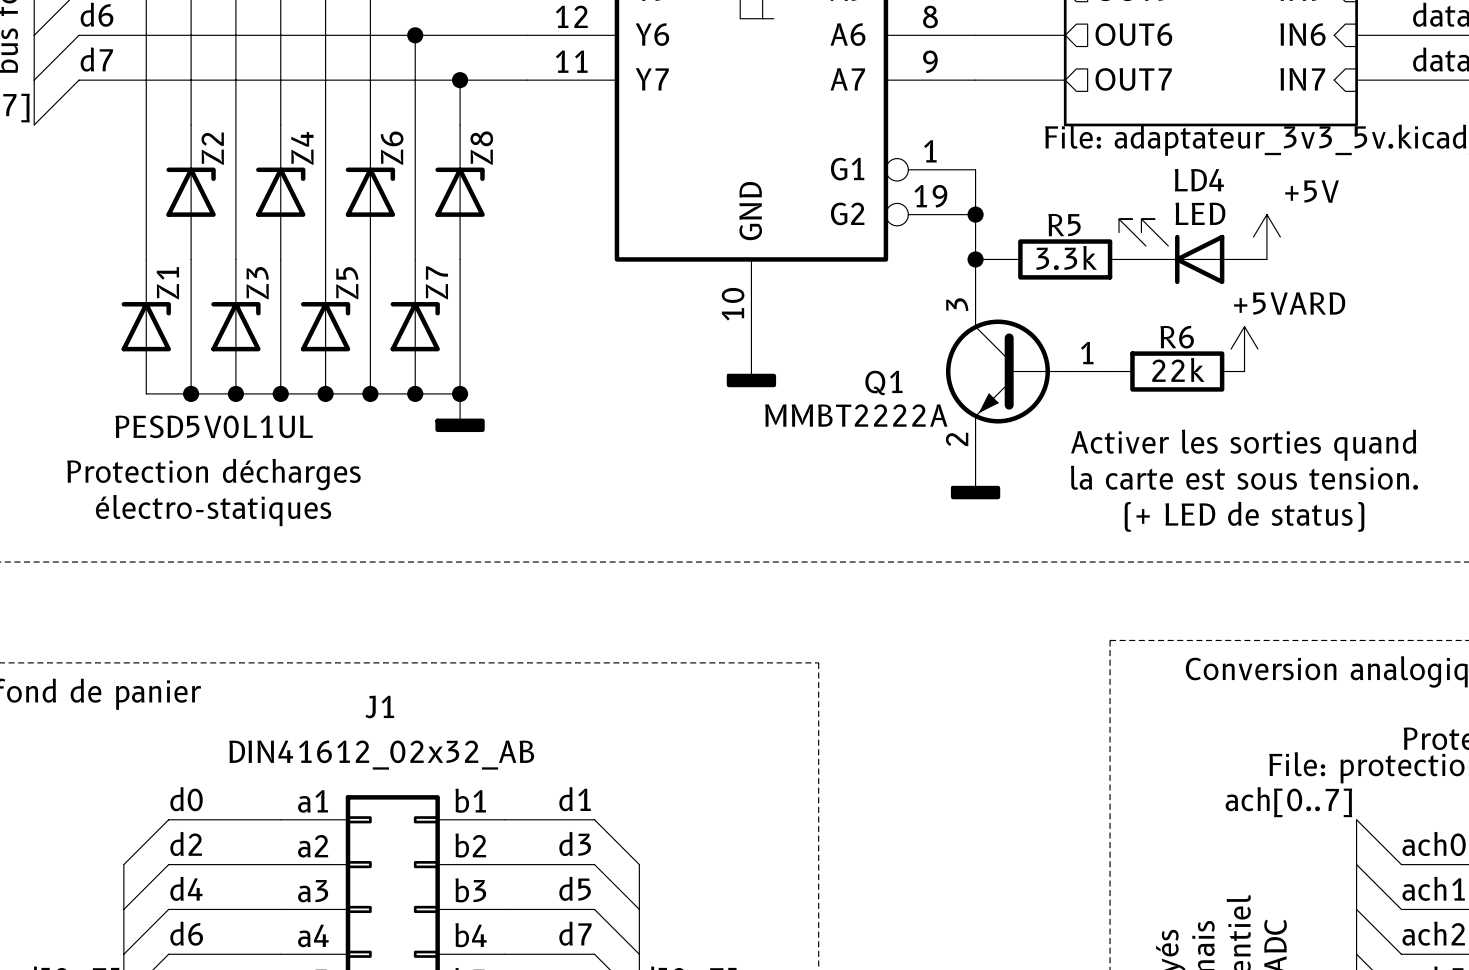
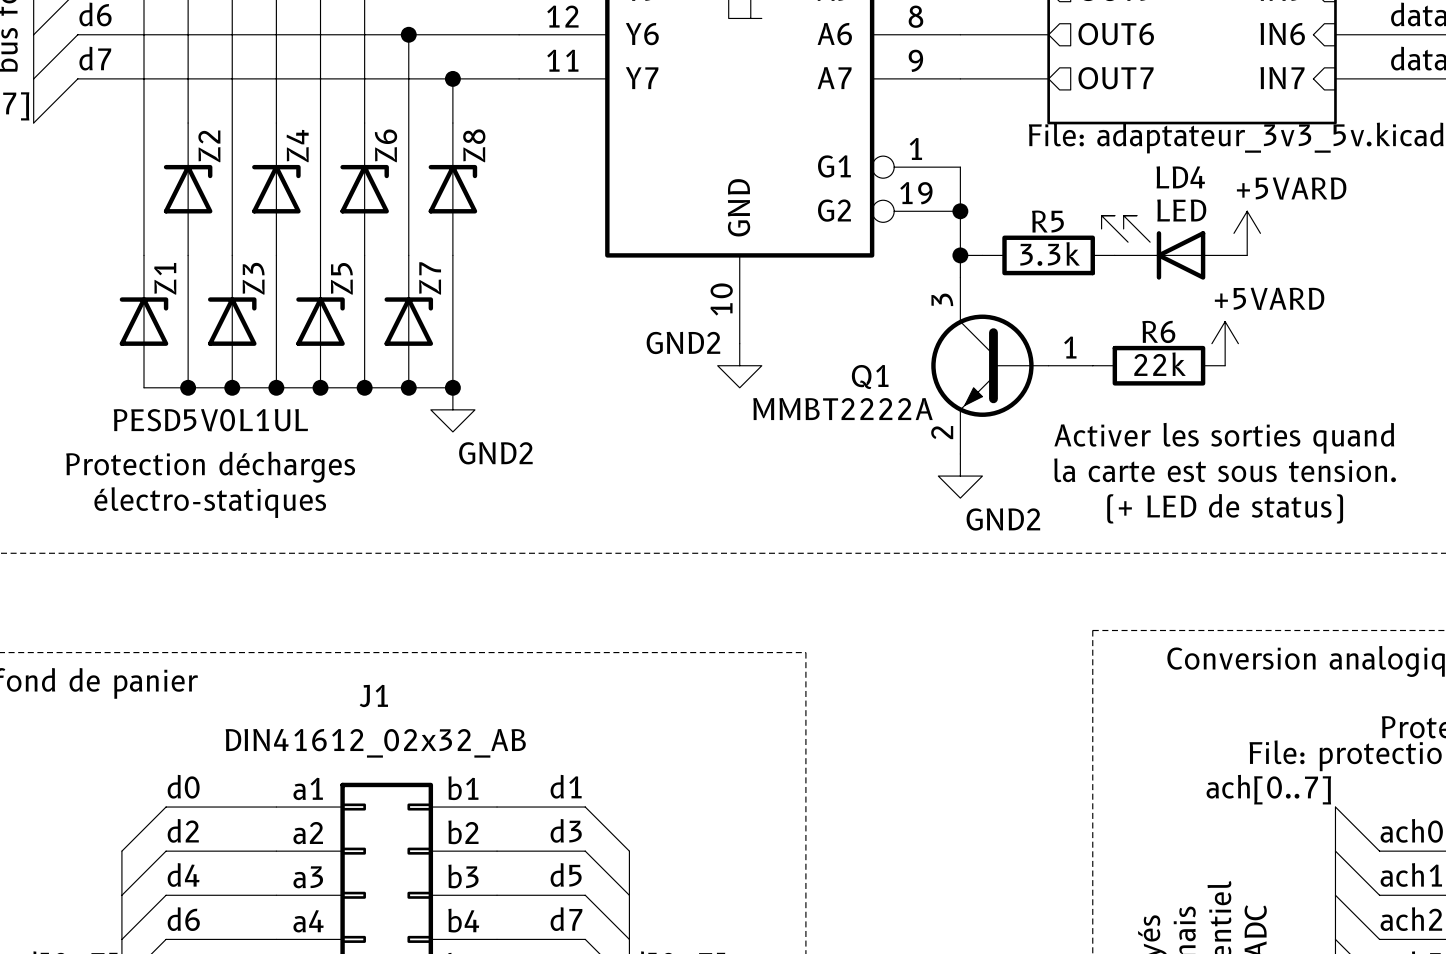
power symbol: +5V (1266, 237) -> +5VARD (1247, 233)
power symbol text: none -> GND2 (683, 342)
power symbol shape: [726, 349, 777, 388] -> [717, 343, 762, 388]
power symbol shape: [435, 393, 485, 433] -> [430, 387, 475, 432]
power symbol text: none -> GND2 (495, 453)
power symbol shape: [950, 461, 1001, 500] -> [938, 453, 983, 499]
power symbol text: none -> GND2 (1003, 519)

